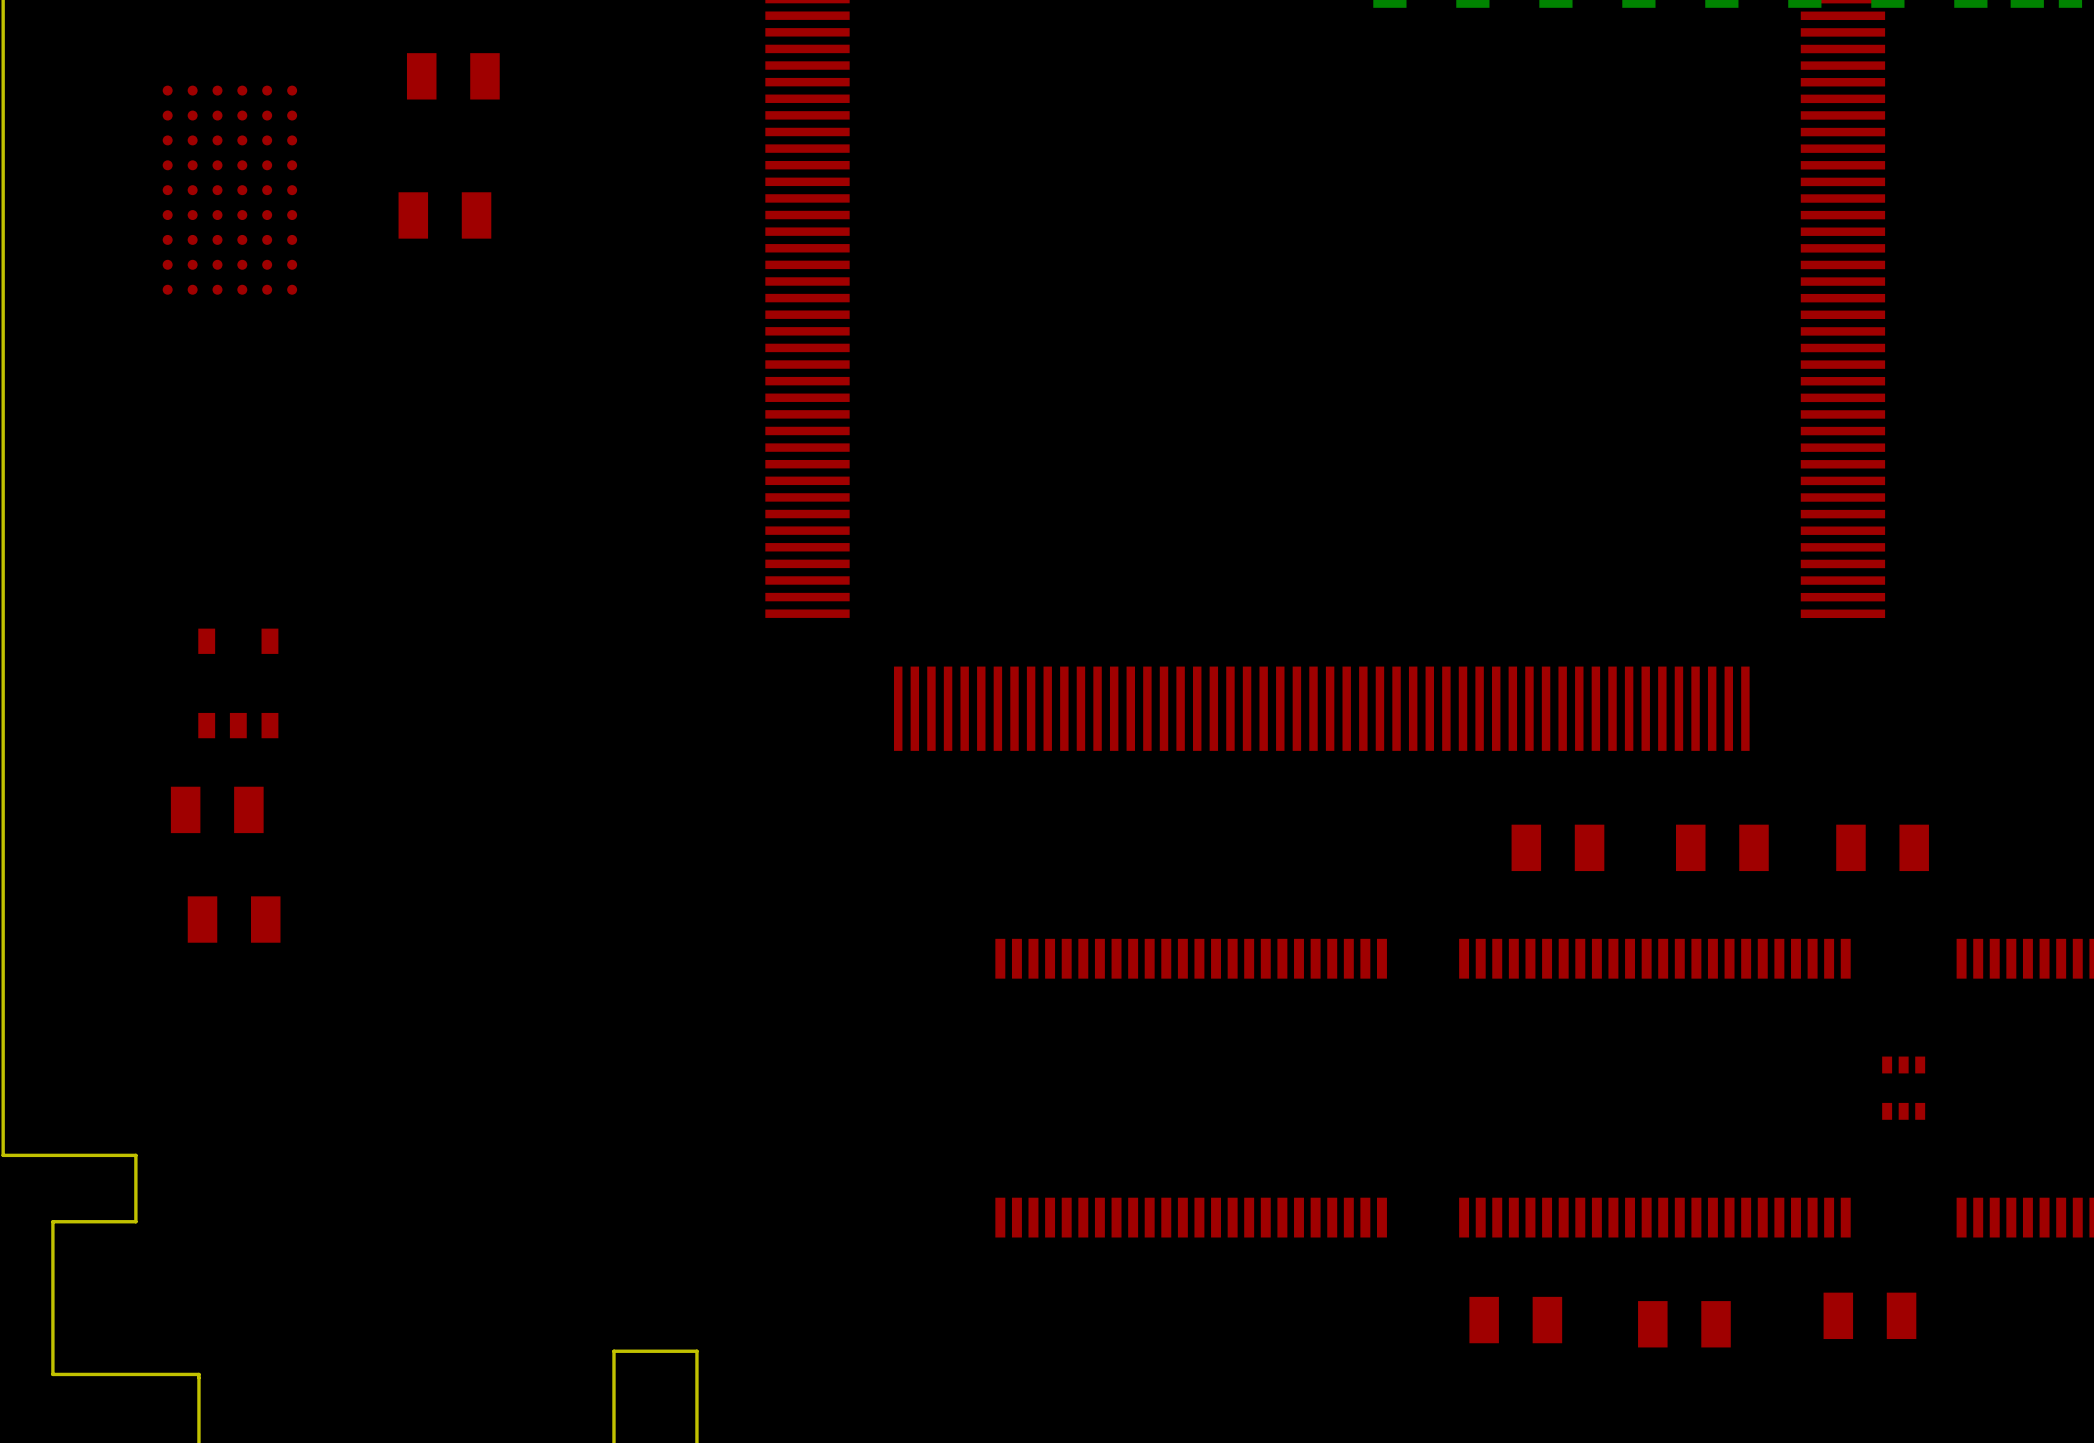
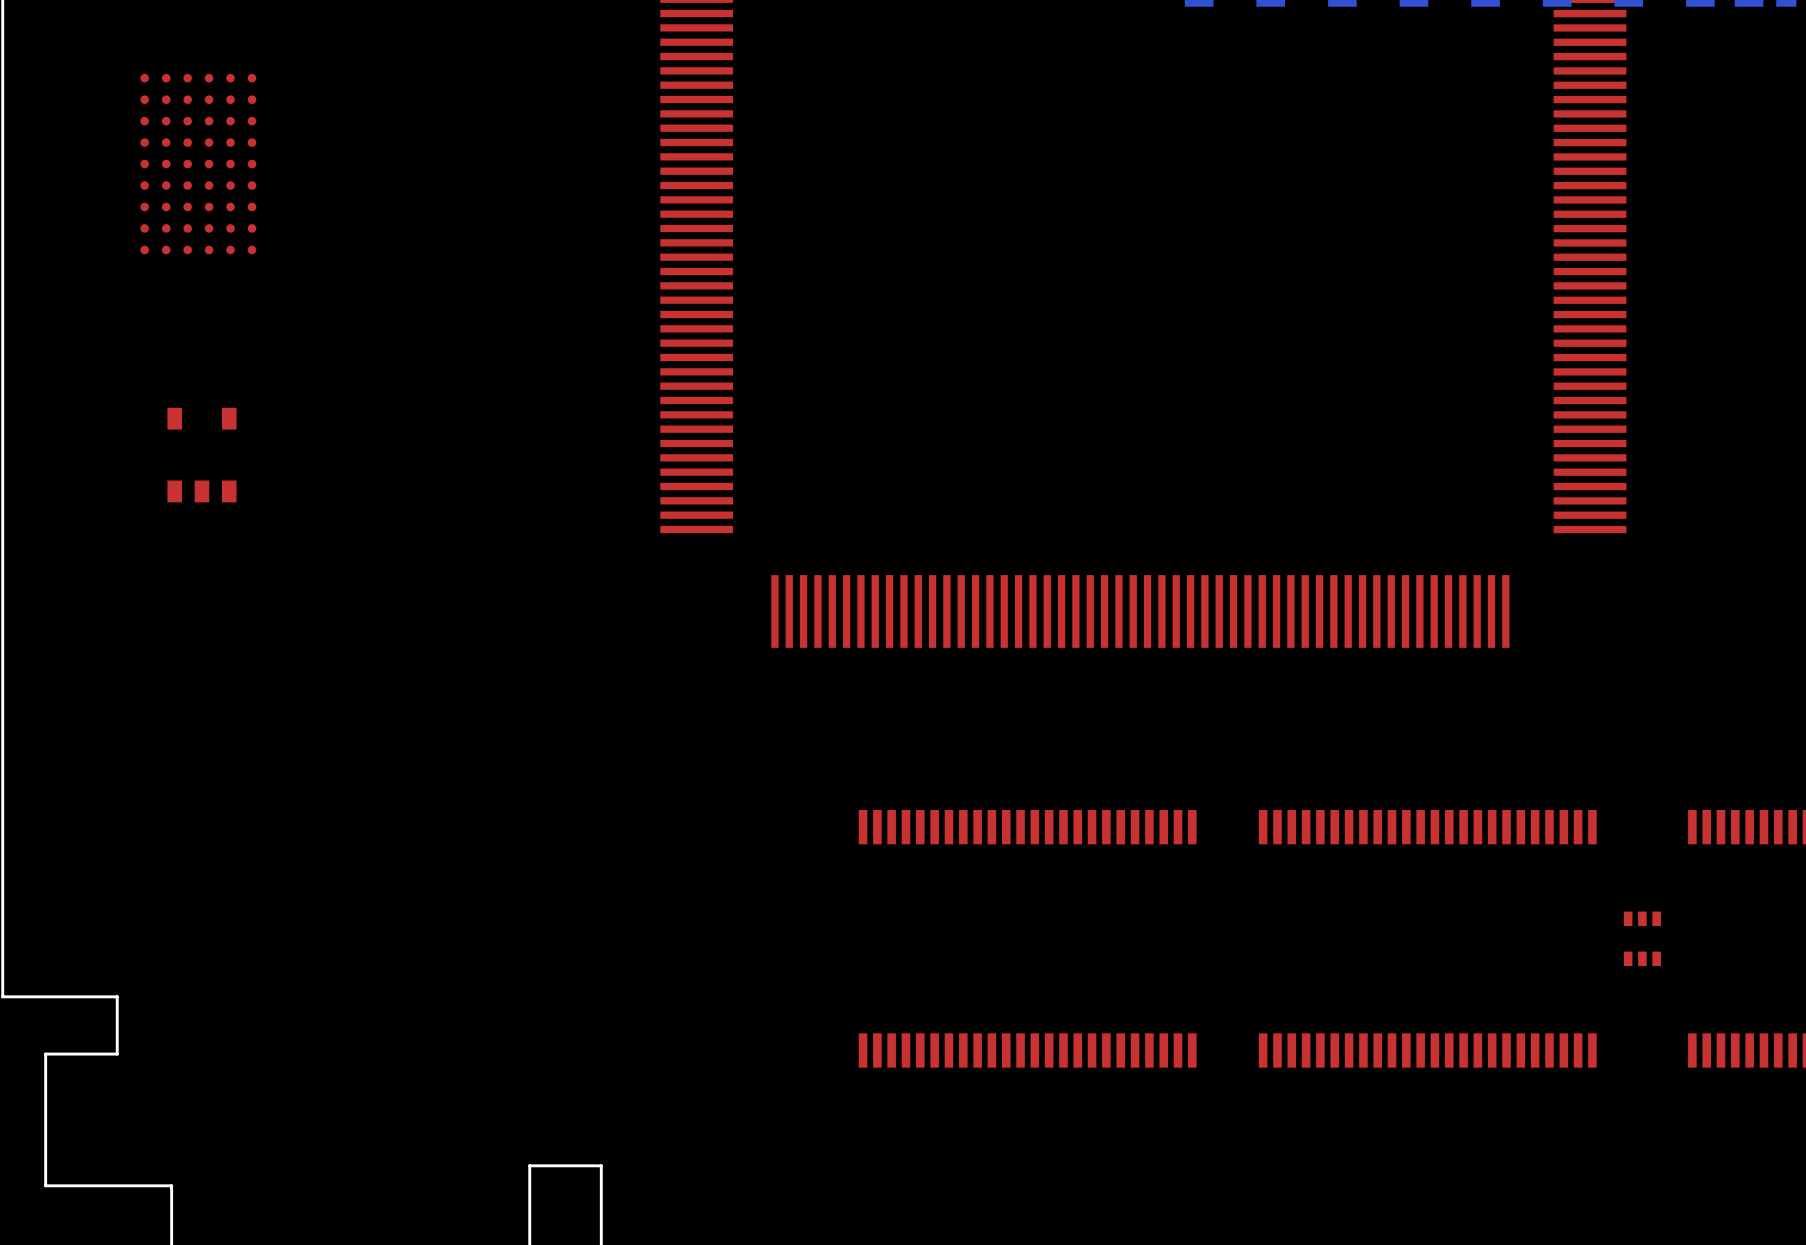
part: (453, 76) -> none
part: (444, 215) -> none
part position: (238, 683) -> (201, 455)
part: (217, 809) -> none
part: (1557, 847) -> none
part: (1722, 847) -> none
part: (1882, 847) -> none
part: (234, 919) -> none
part: (1869, 1315) -> none
part: (1515, 1320) -> none
part: (1684, 1324) -> none

